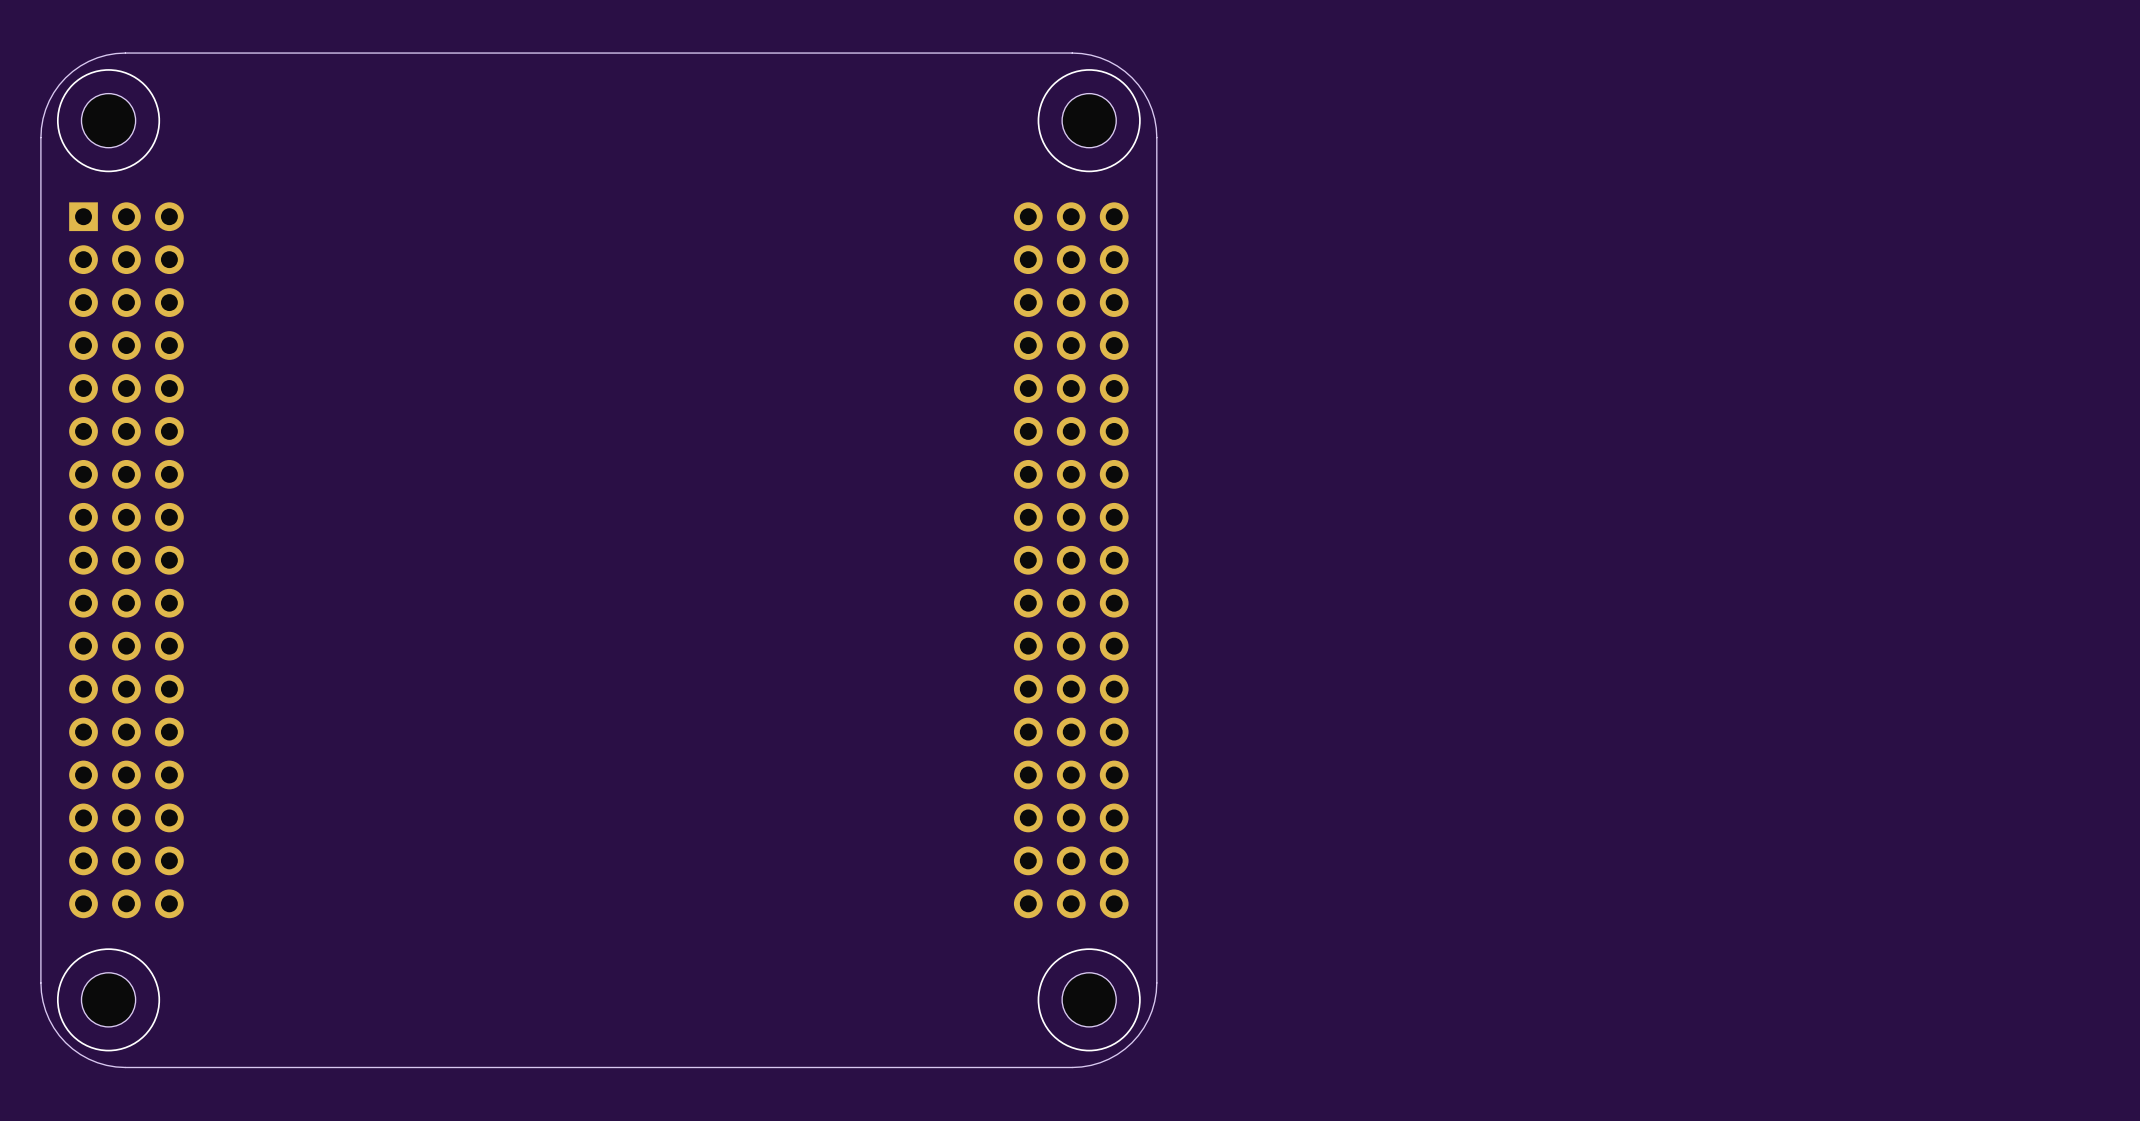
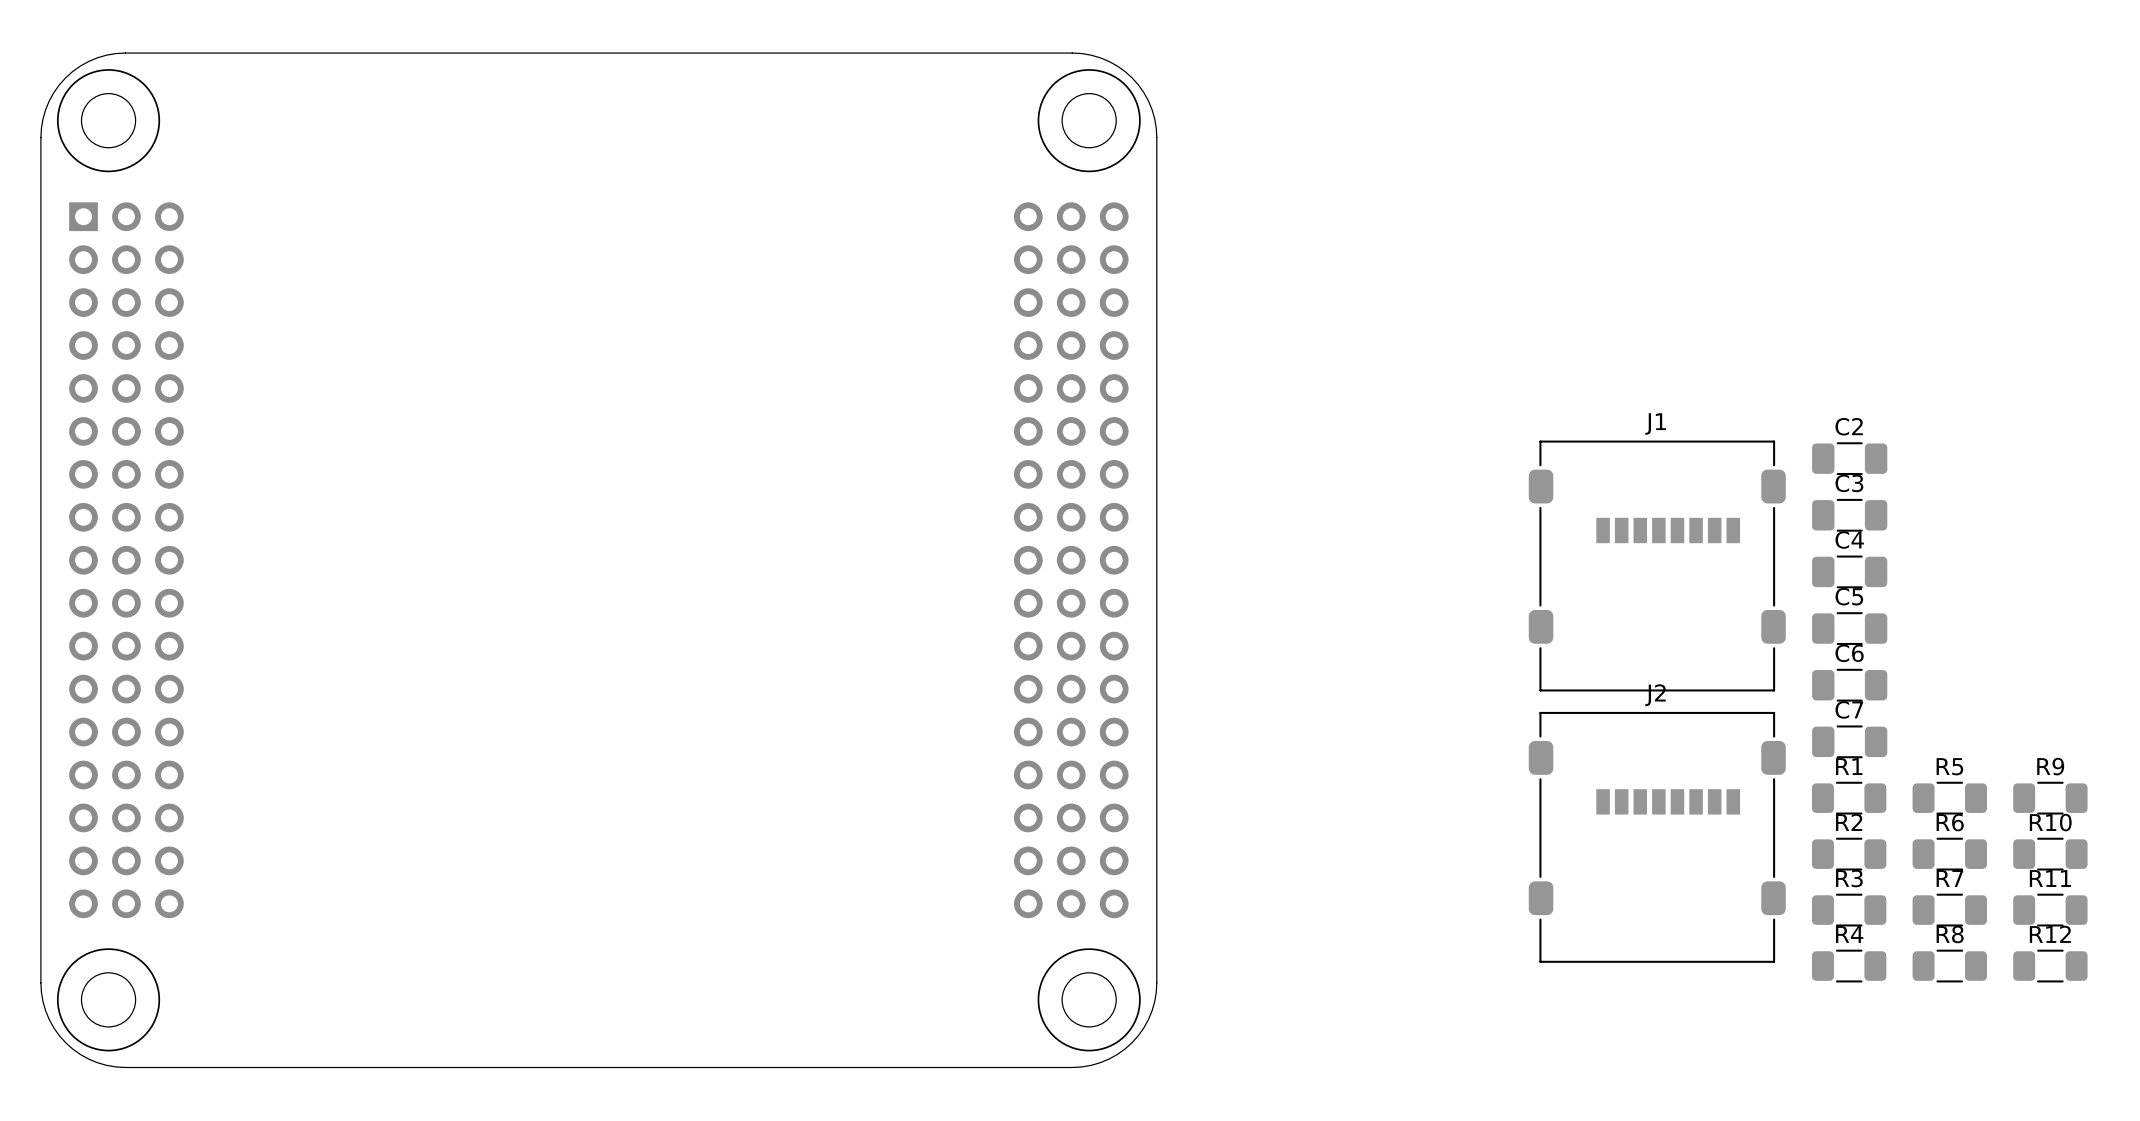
C2: none -> (1849, 458)
C3: none -> (1849, 515)
J1: none -> (1657, 566)
C4: none -> (1849, 571)
C5: none -> (1849, 628)
C6: none -> (1849, 685)
C7: none -> (1849, 741)
R1: none -> (1849, 798)
R5: none -> (1949, 798)
R9: none -> (2050, 798)
J2: none -> (1657, 837)
R2: none -> (1849, 854)
R6: none -> (1949, 854)
R10: none -> (2050, 854)
R3: none -> (1849, 910)
R7: none -> (1949, 910)
R11: none -> (2050, 910)
R4: none -> (1849, 966)
R8: none -> (1949, 966)
R12: none -> (2050, 966)

